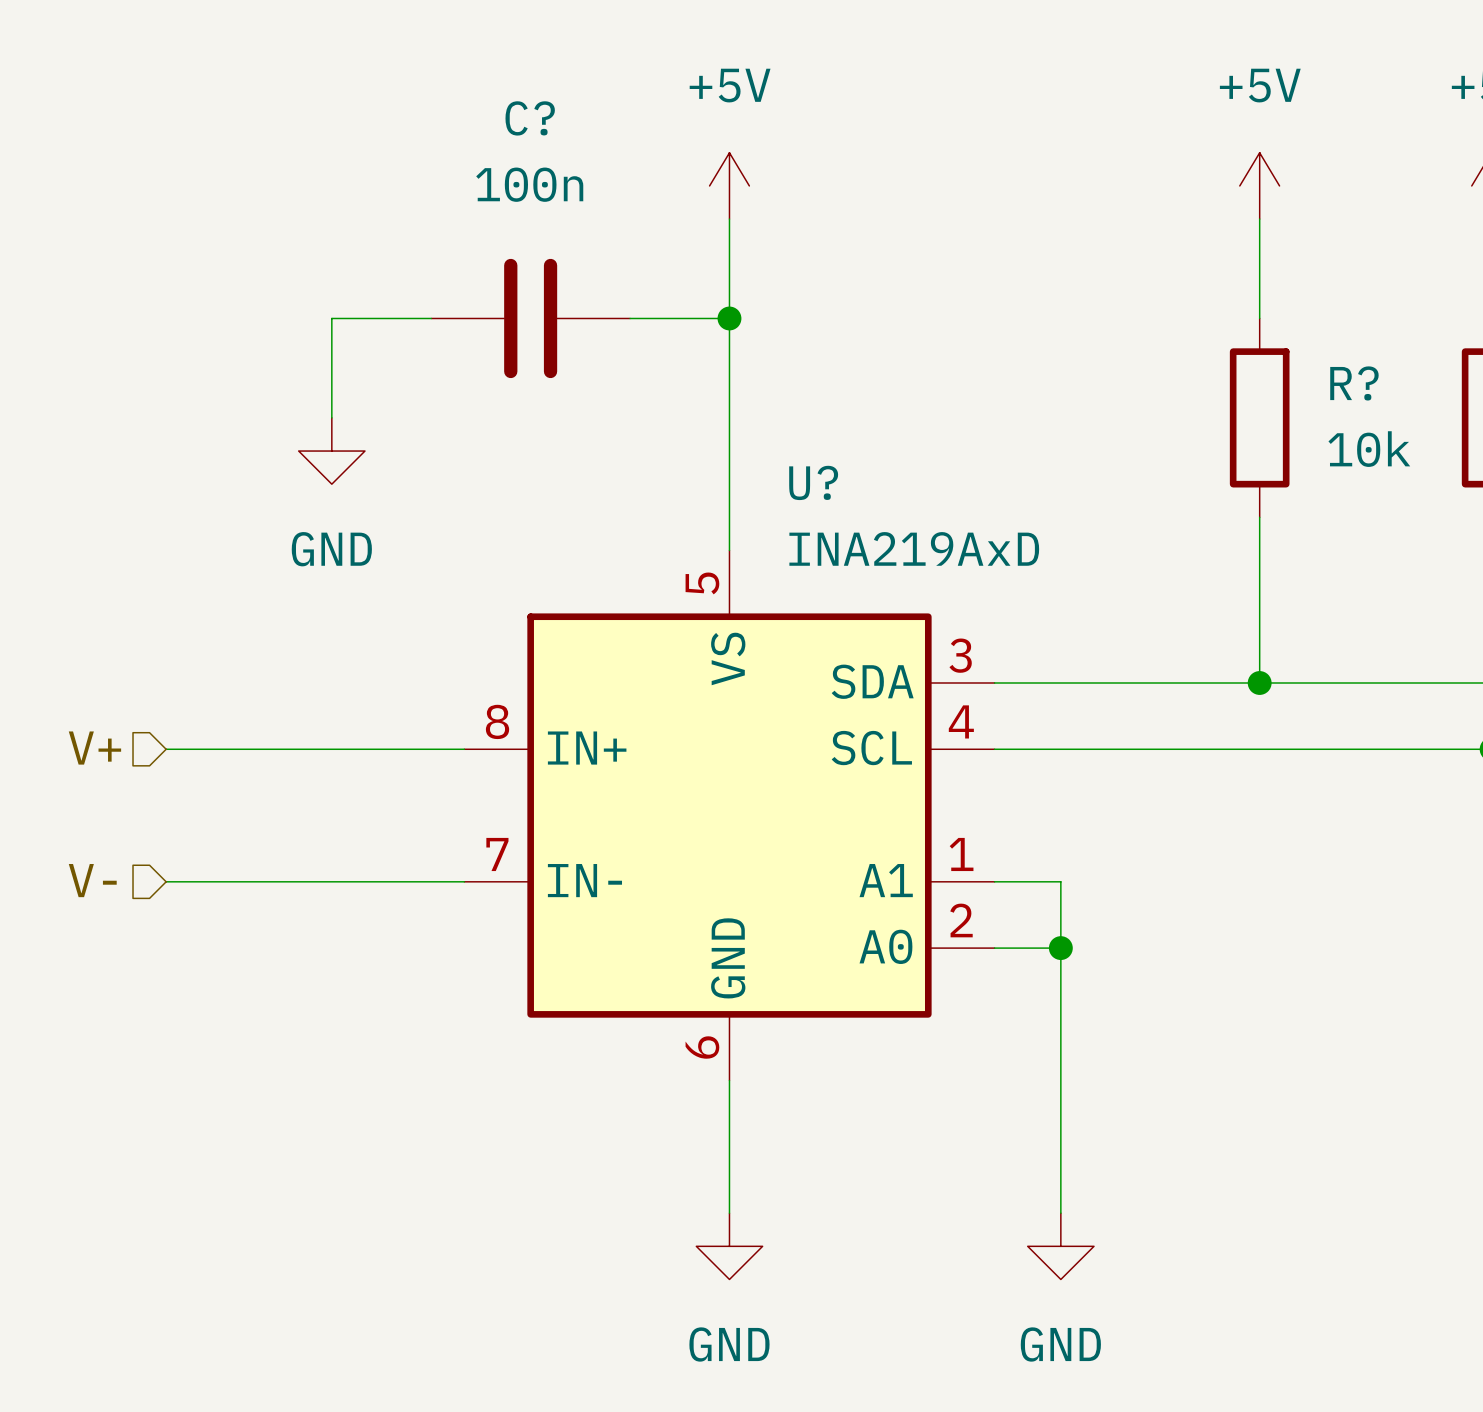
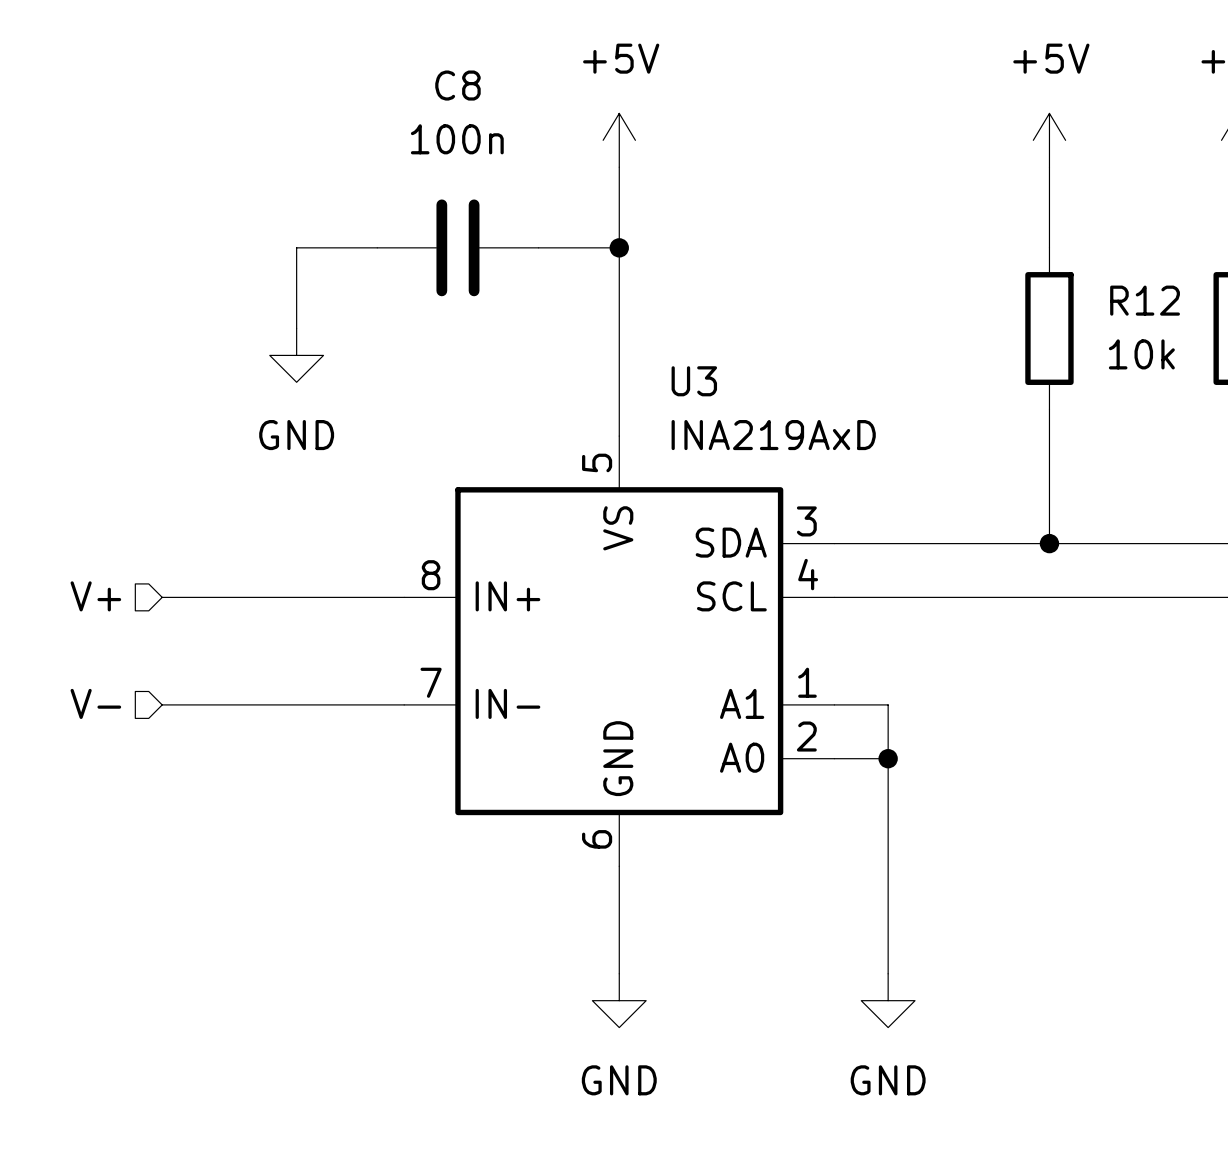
C? name: C? (530, 118) -> C8 (457, 85)
R? name: R? (1354, 383) -> R12 (1145, 300)
U? name: U? (813, 482) -> U3 (694, 381)

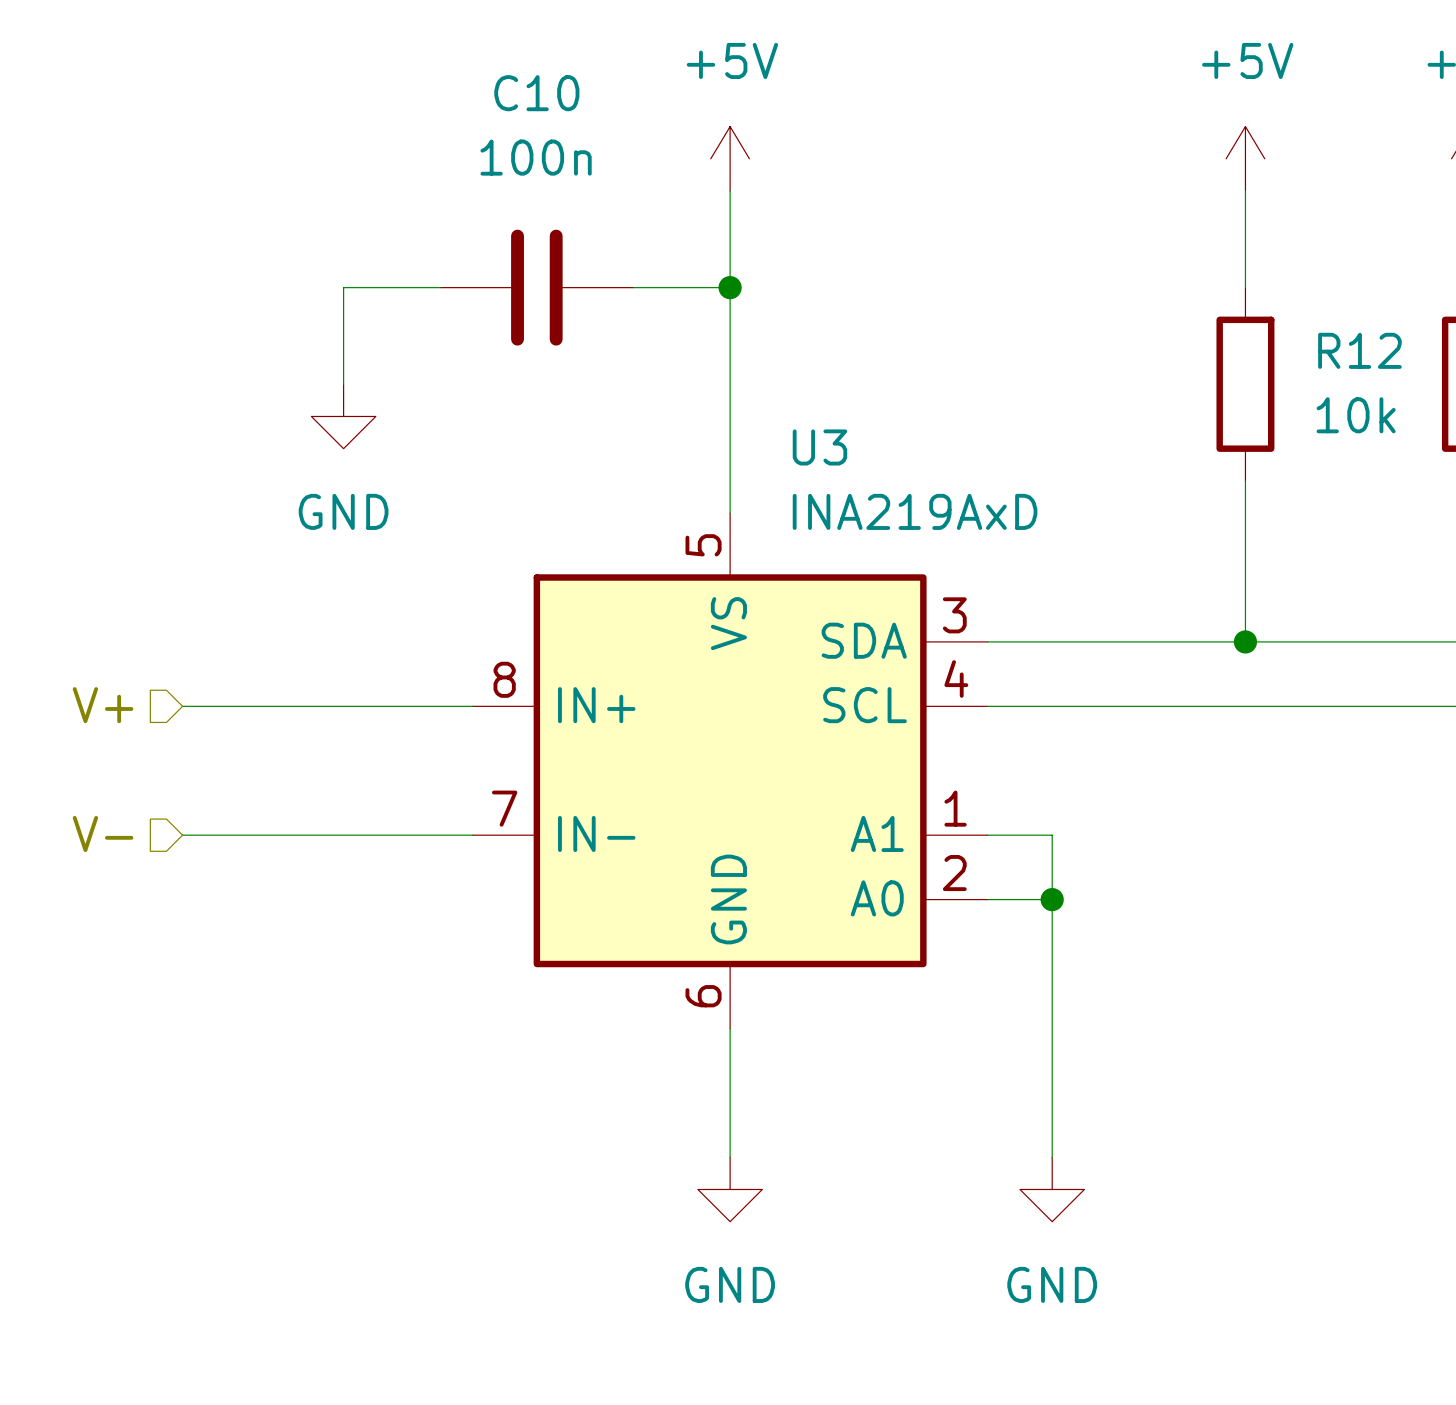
C8 name: C8 (457, 85) -> C10 (536, 93)

